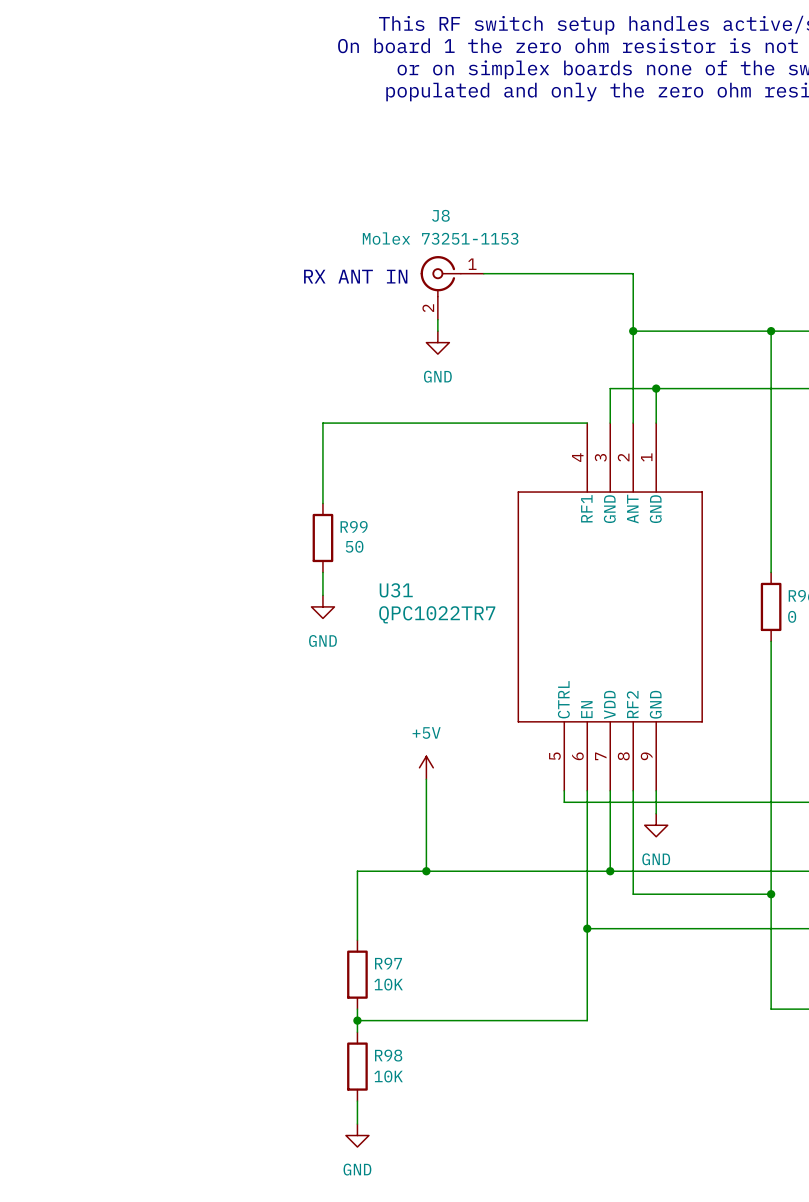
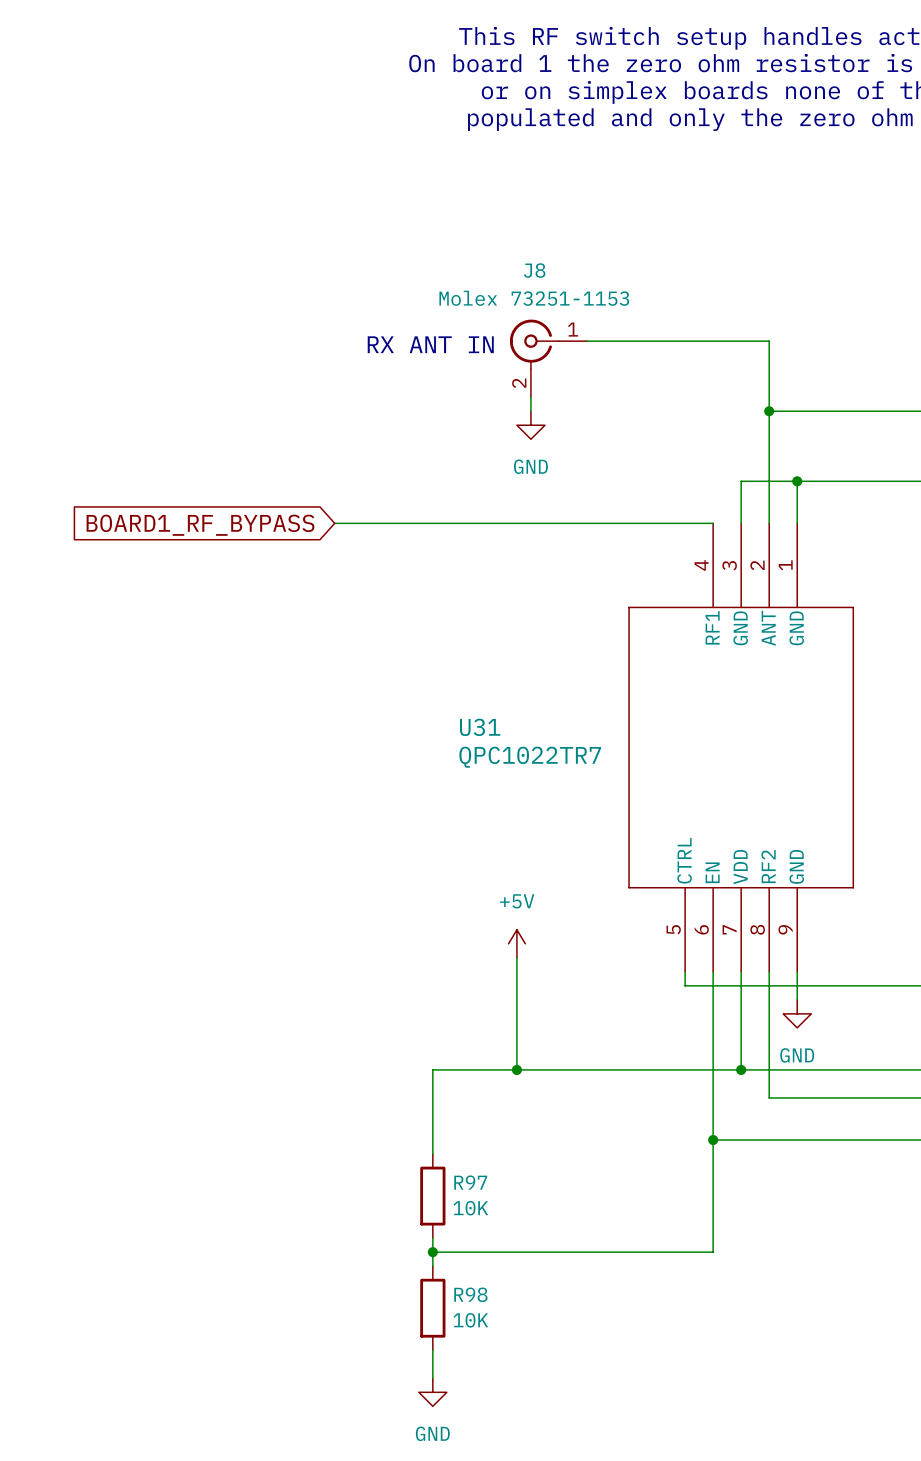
wire: (322, 423) (322, 503) -> (390, 523) (334, 523)
global label: none -> BOARD1_RF_BYPASS (200, 525)
R99: 50 (322, 537) -> none
wire: (322, 572) (322, 595) -> none
power symbol: GND (322, 606) -> none

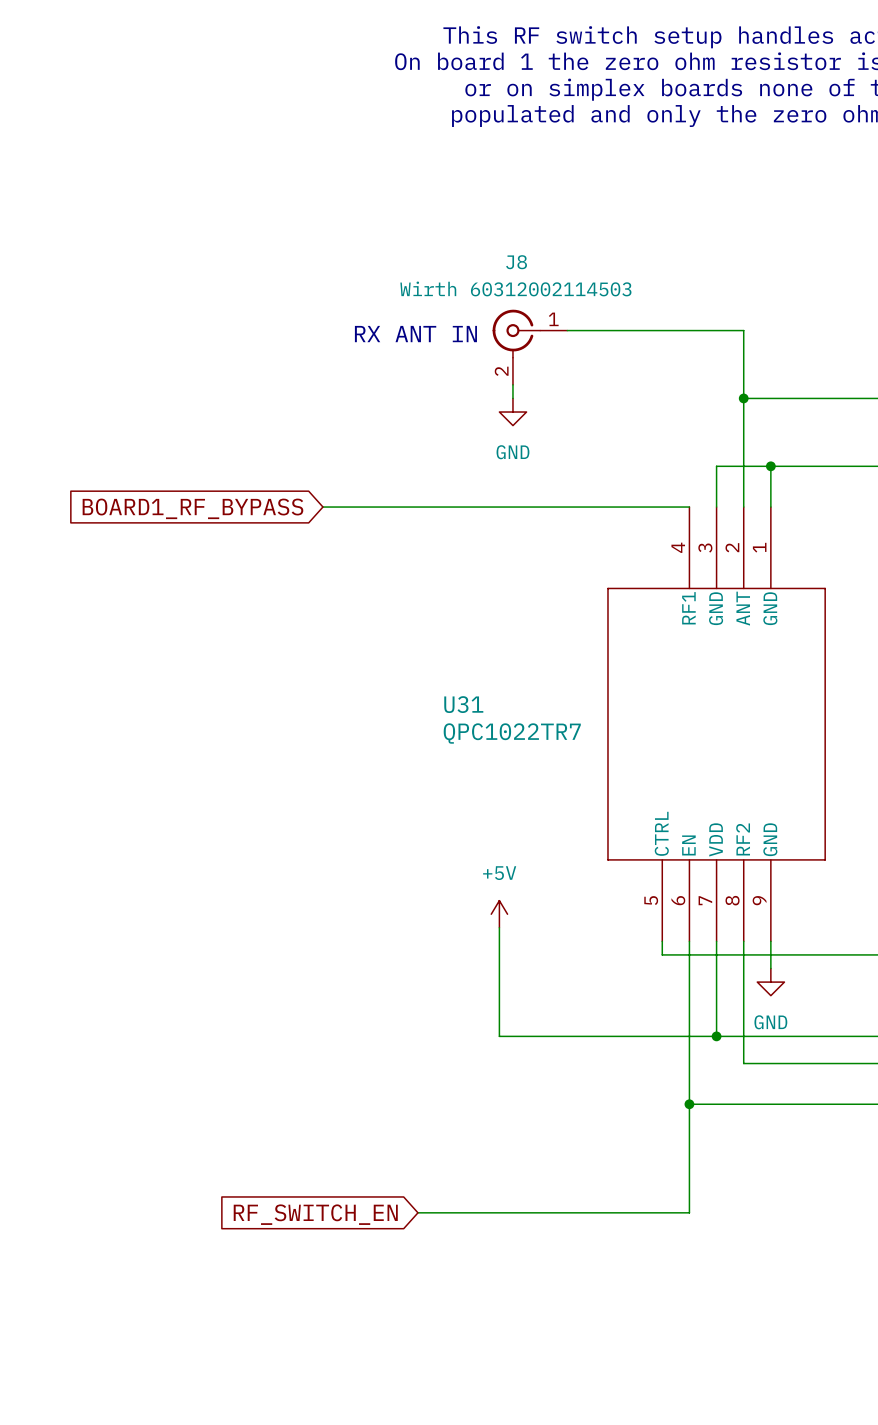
J8 value: Molex 73251-1153 (534, 298) -> Wirth 60312002114503 (515, 288)
wire: (516, 1069) (432, 1069) (432, 1154) -> none
junction: (516, 1069) -> none
R97: 10K (432, 1196) -> none
wire: (432, 1238) (432, 1266) -> none
junction: (432, 1252) -> none
global label: none -> RF_SWITCH_EN (315, 1214)
R98: 10K (432, 1308) -> none
wire: (432, 1350) (432, 1378) -> none
power symbol: GND (432, 1392) -> none

